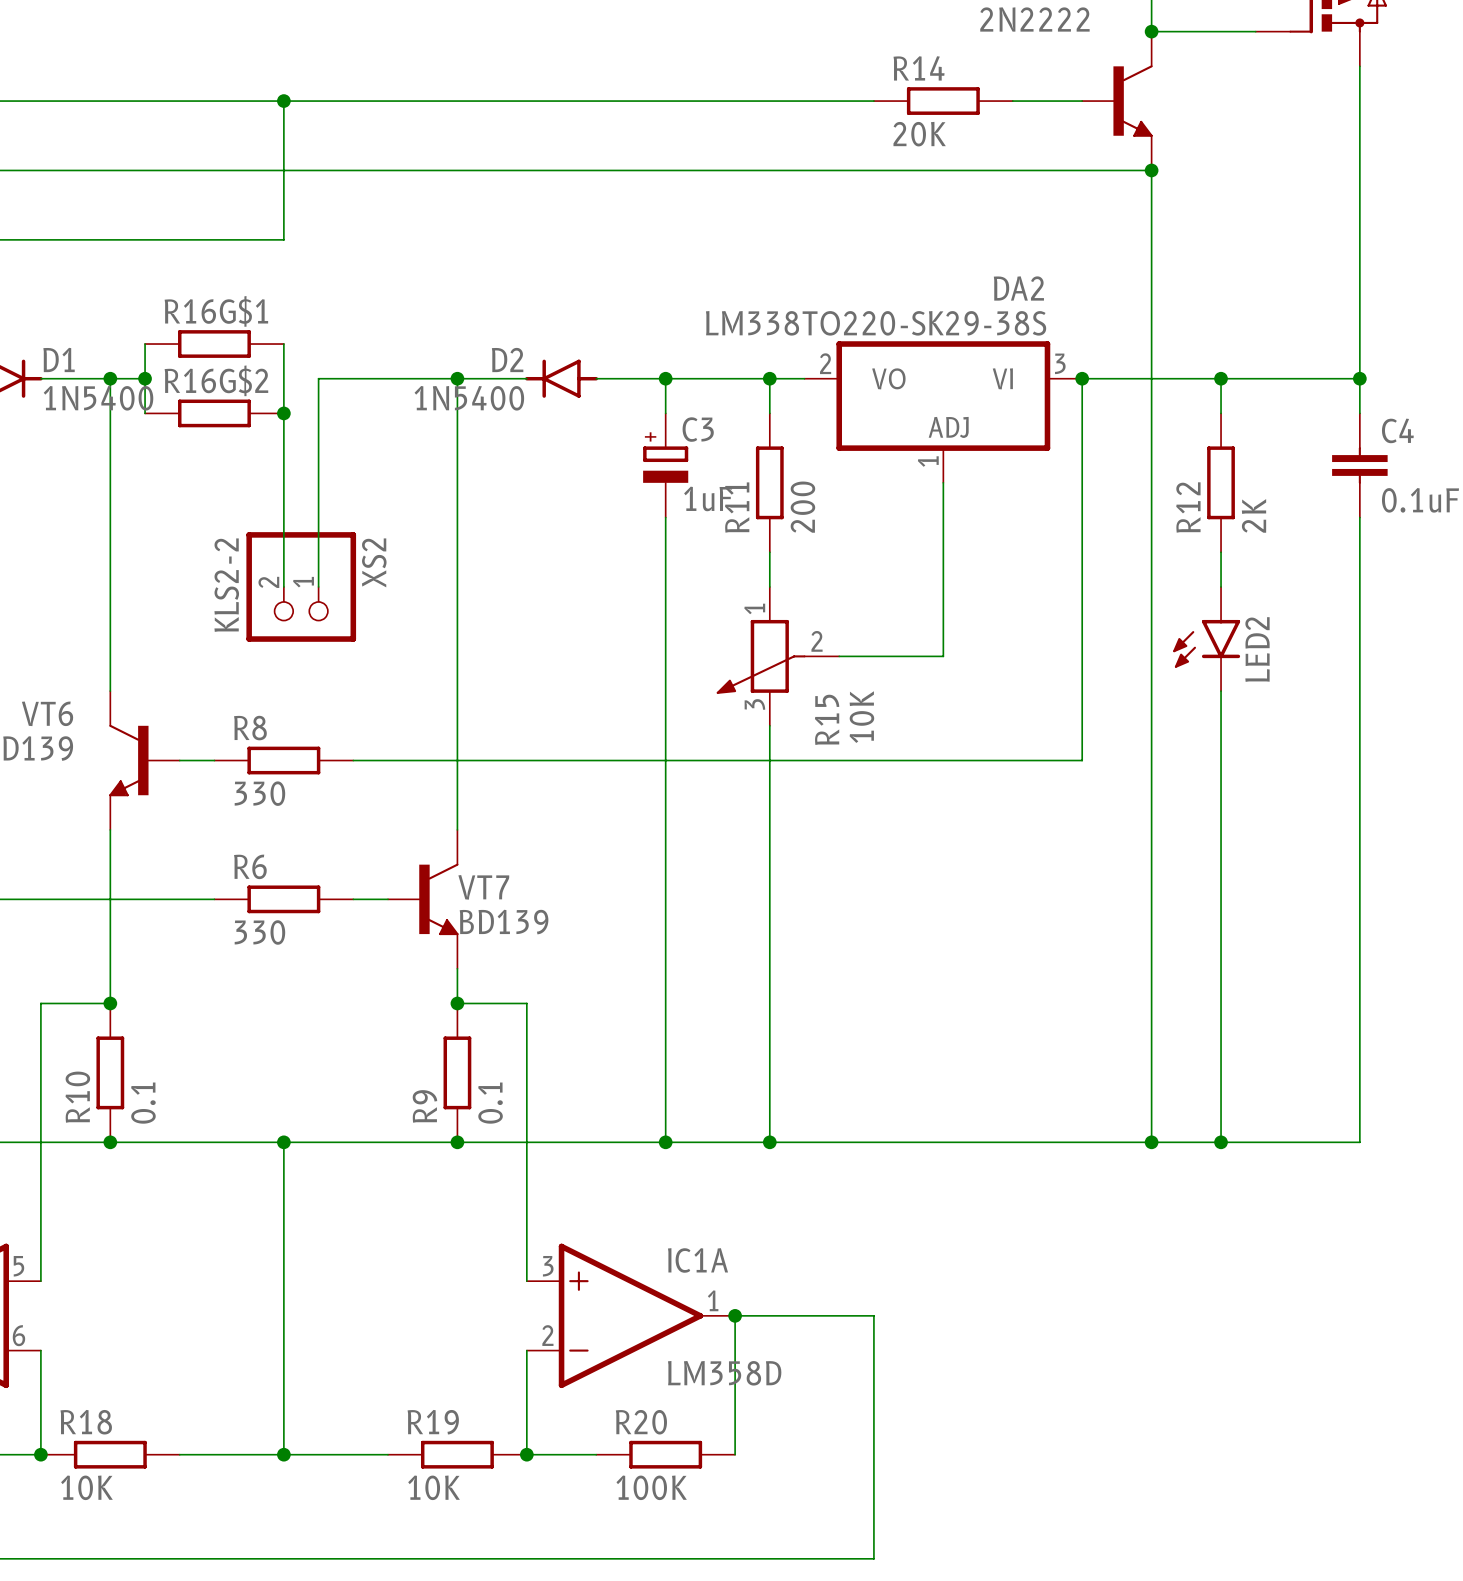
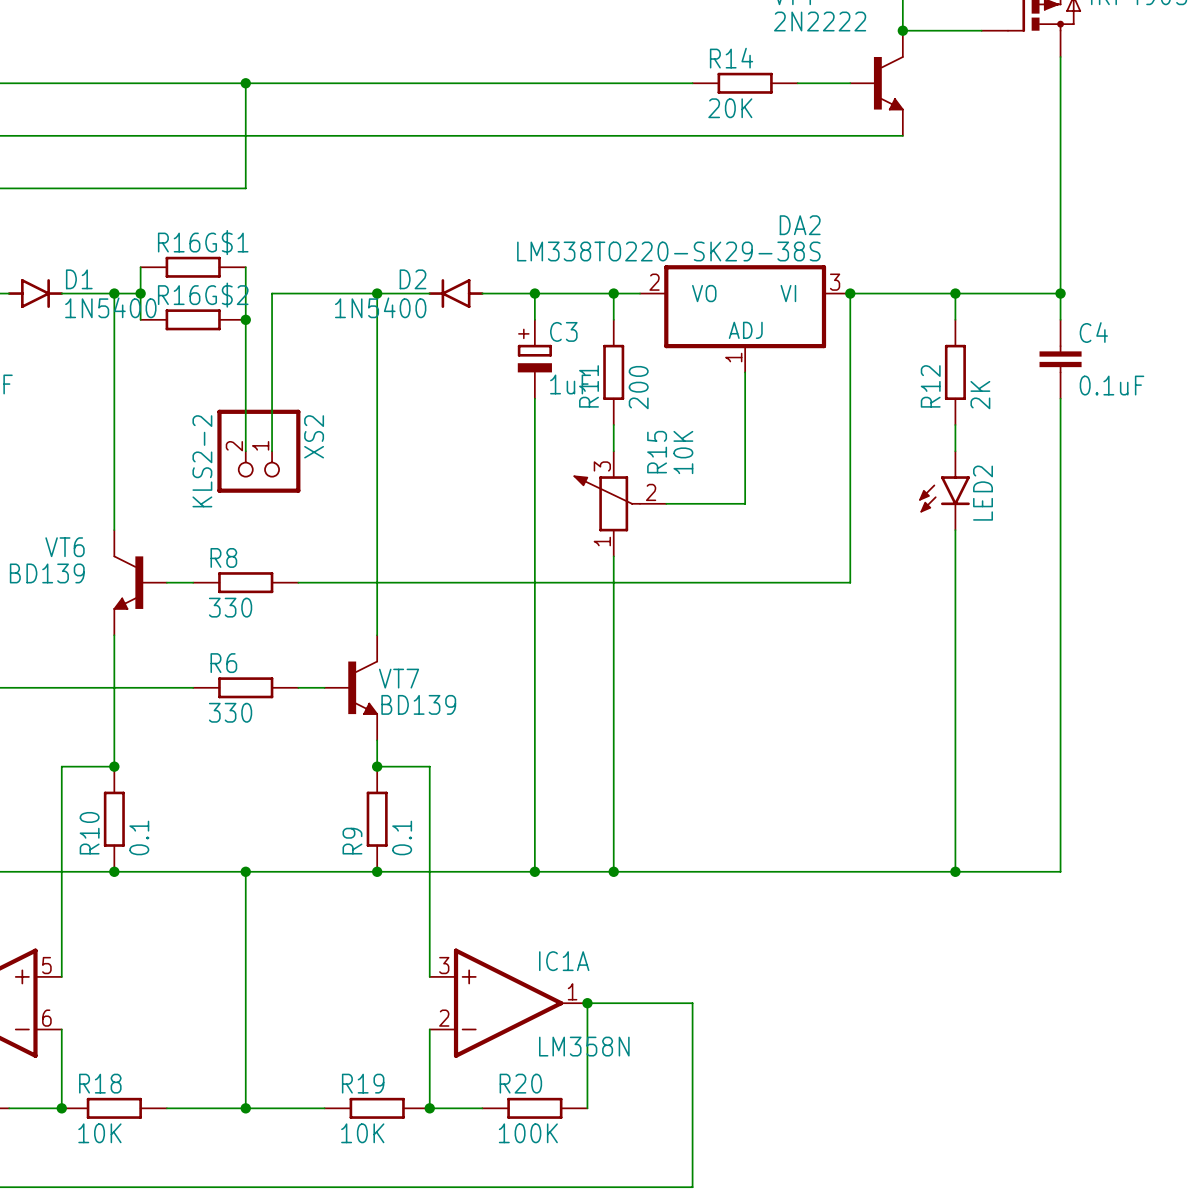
wire: (1151, 170) (1151, 1142) -> none
junction: (1151, 170) -> none
R15 flip: as is (761, 656) -> up-down (607, 503)
junction: (1151, 1142) -> none
IC1A value: LM358D (724, 1373) -> LM358N (584, 1046)

